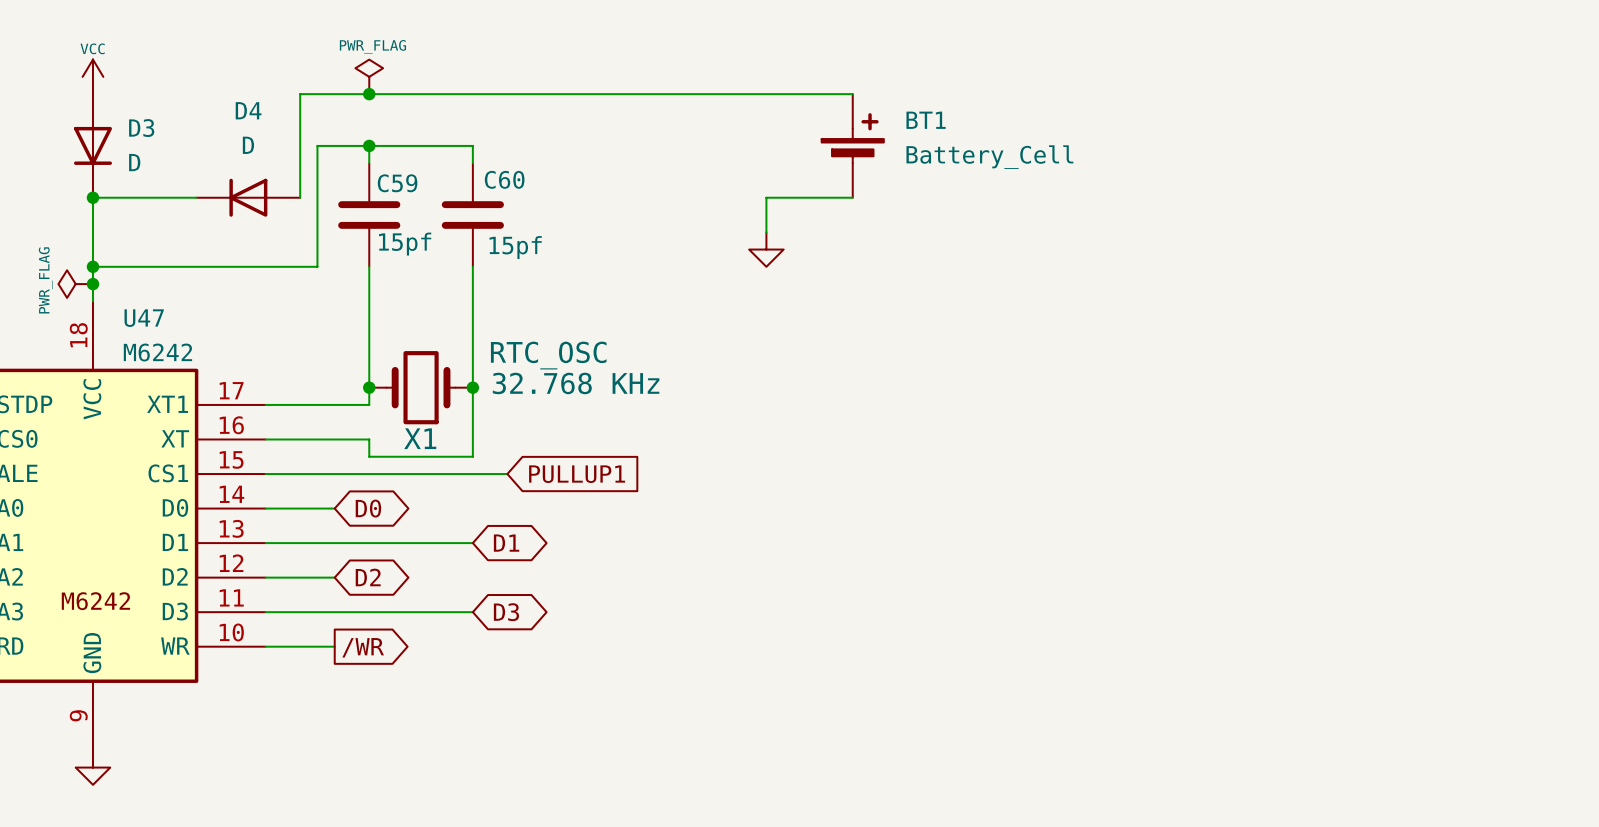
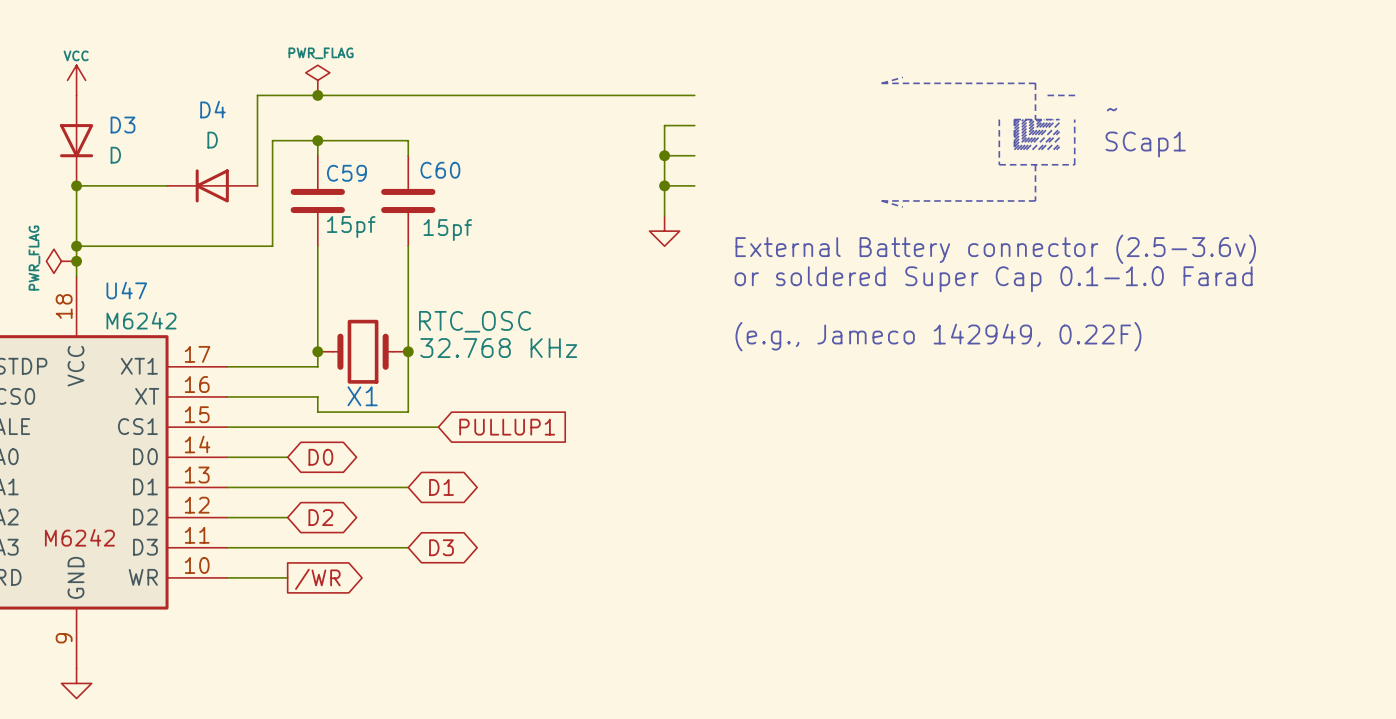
line: none -> (902, 77) (881, 83) (1035, 83) (1035, 119) (1014, 140)
wire: (800, 94) (852, 94) -> none
line: none -> (1047, 95) (1077, 95)
text: none -> ~ (1112, 109)
line: none -> (999, 119) (999, 164) (1074, 164) (1074, 119)
line: none -> (1017, 119) (1014, 122)
line: none -> (1020, 119) (1014, 125)
line: none -> (1023, 119) (1014, 128)
line: none -> (1026, 119) (1014, 131)
line: none -> (1029, 119) (1014, 134)
line: none -> (1032, 119) (1014, 137)
line: none -> (1038, 119) (1014, 143)
line: none -> (1041, 119) (1014, 146)
line: none -> (1044, 119) (1014, 149) (1014, 119) (1059, 119)
line: none -> (1047, 119) (1017, 149)
line: none -> (1050, 119) (1020, 149)
line: none -> (1053, 119) (1023, 149)
line: none -> (1056, 119) (1026, 149)
line: none -> (1059, 122) (1032, 149)
wire: none -> (694, 125) (664, 125) (664, 185)
line: none -> (1059, 128) (1038, 149)
line: none -> (1059, 131) (1041, 149)
line: none -> (1059, 137) (1047, 149)
BT1: Battery_Cell (852, 145) -> none
line: none -> (1059, 143) (1053, 149)
text: none -> SCap1 (1145, 144)
line: none -> (1059, 146) (1056, 149)
wire: none -> (664, 155) (694, 155)
junction: none -> (664, 155)
line: none -> (1035, 164) (1035, 200) (881, 200) (902, 207)
junction: none -> (664, 185)
wire: (800, 197) (852, 197) -> none
text: none -> External Battery connector (2.5-3.6v) (995, 249)
text: none -> or soldered Super Cap 0.1-1.0 Farad (993, 279)
text: none -> (e.g., Jameco 142949, 0.22F) (938, 336)

